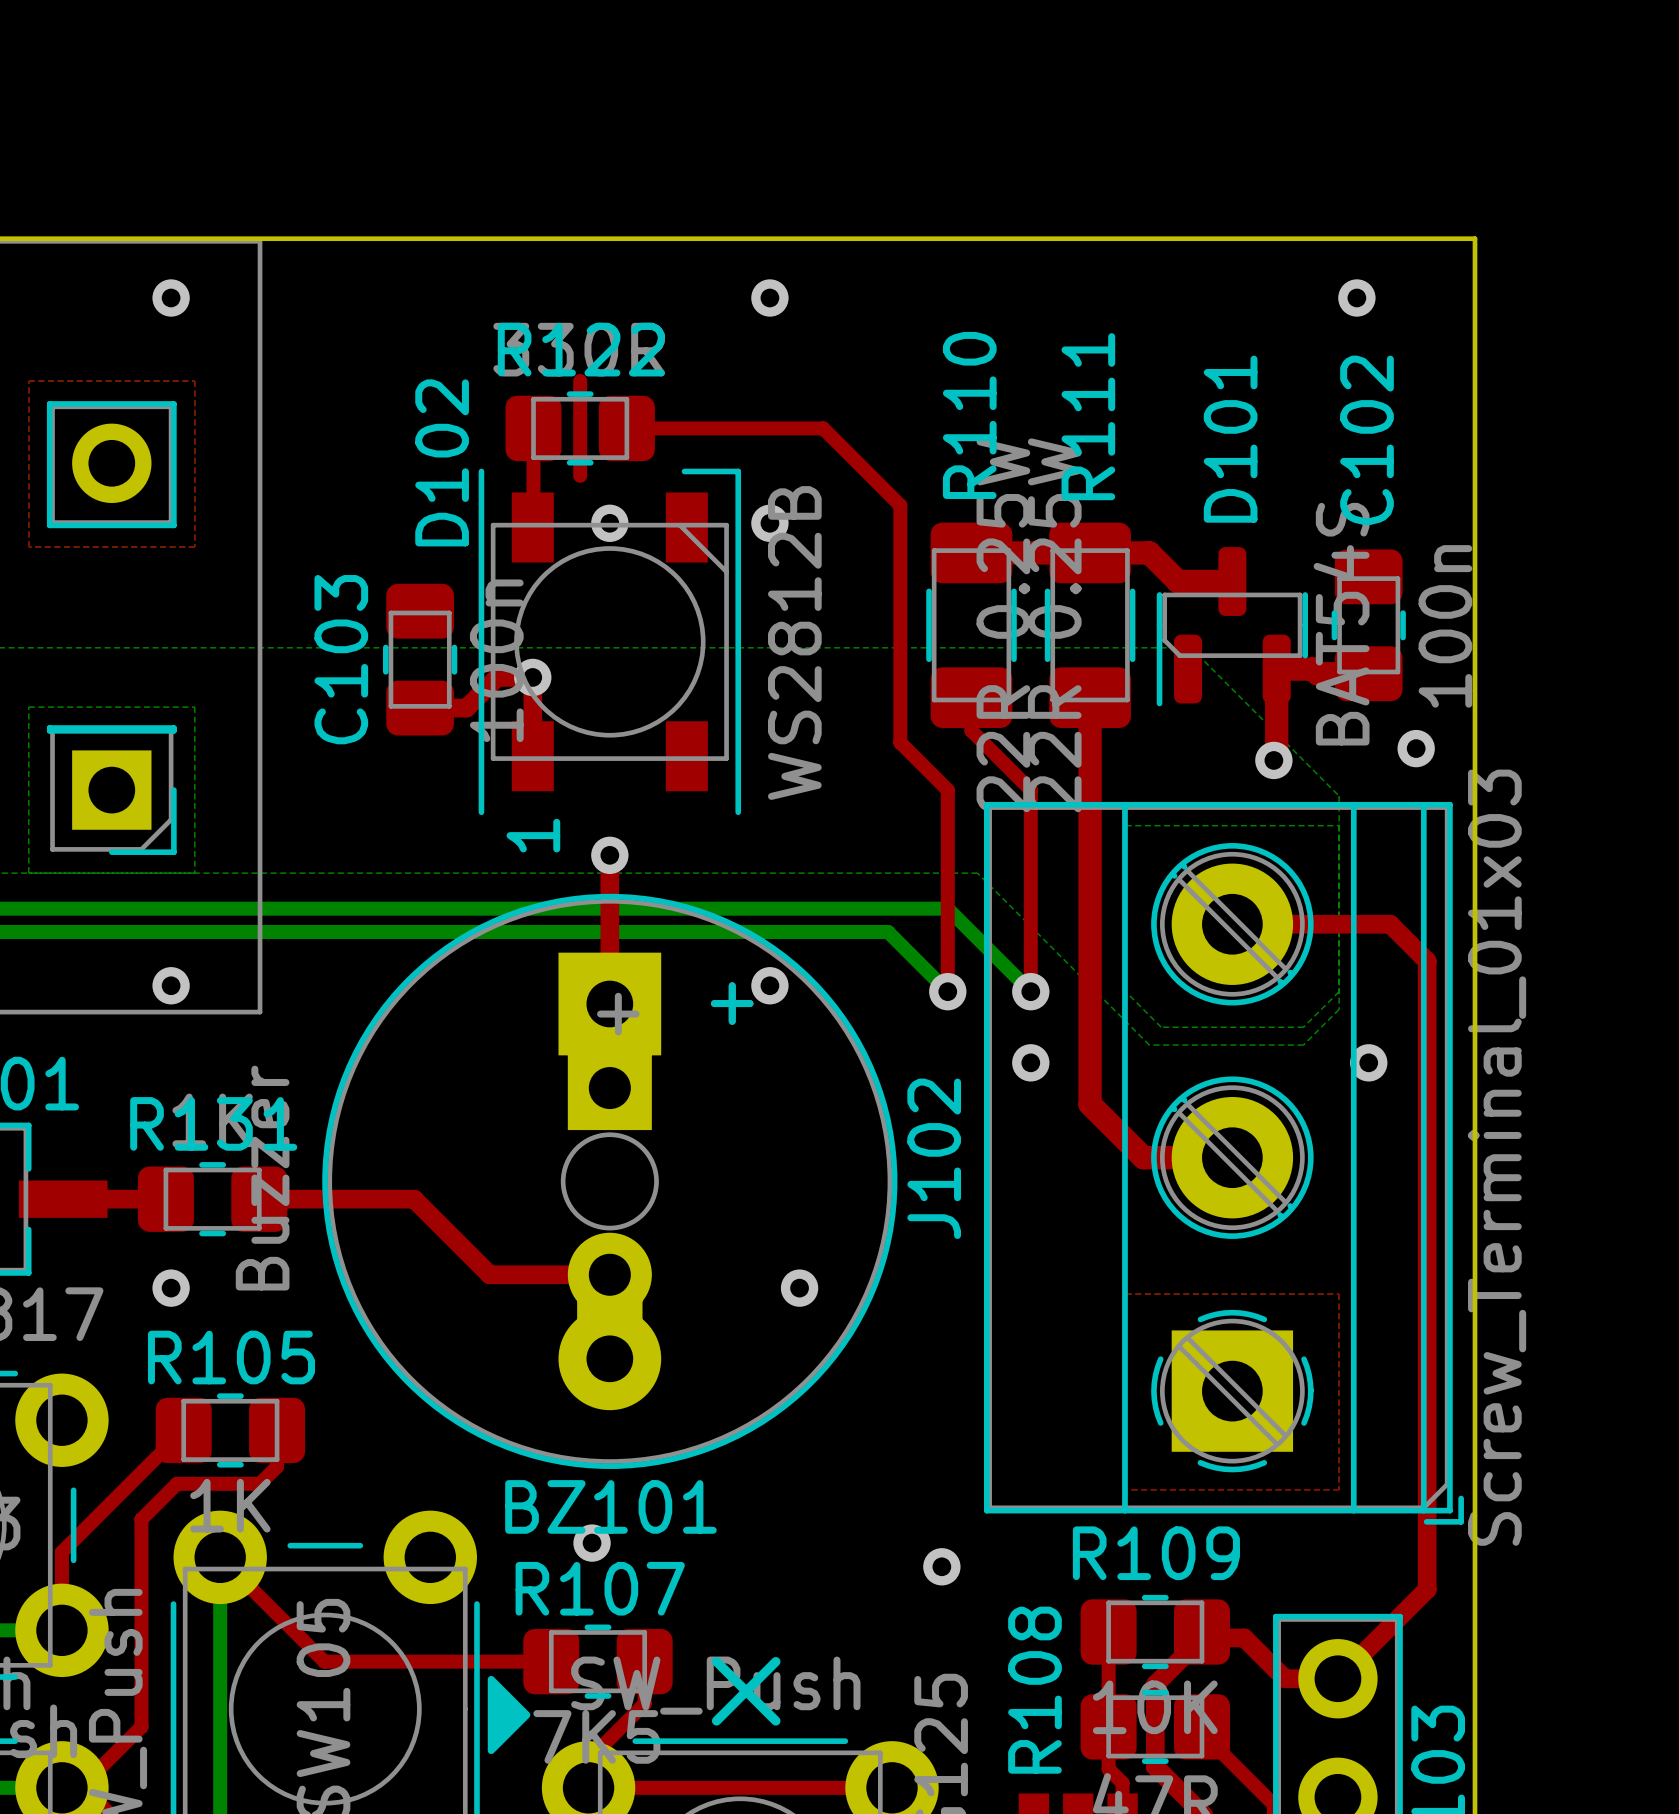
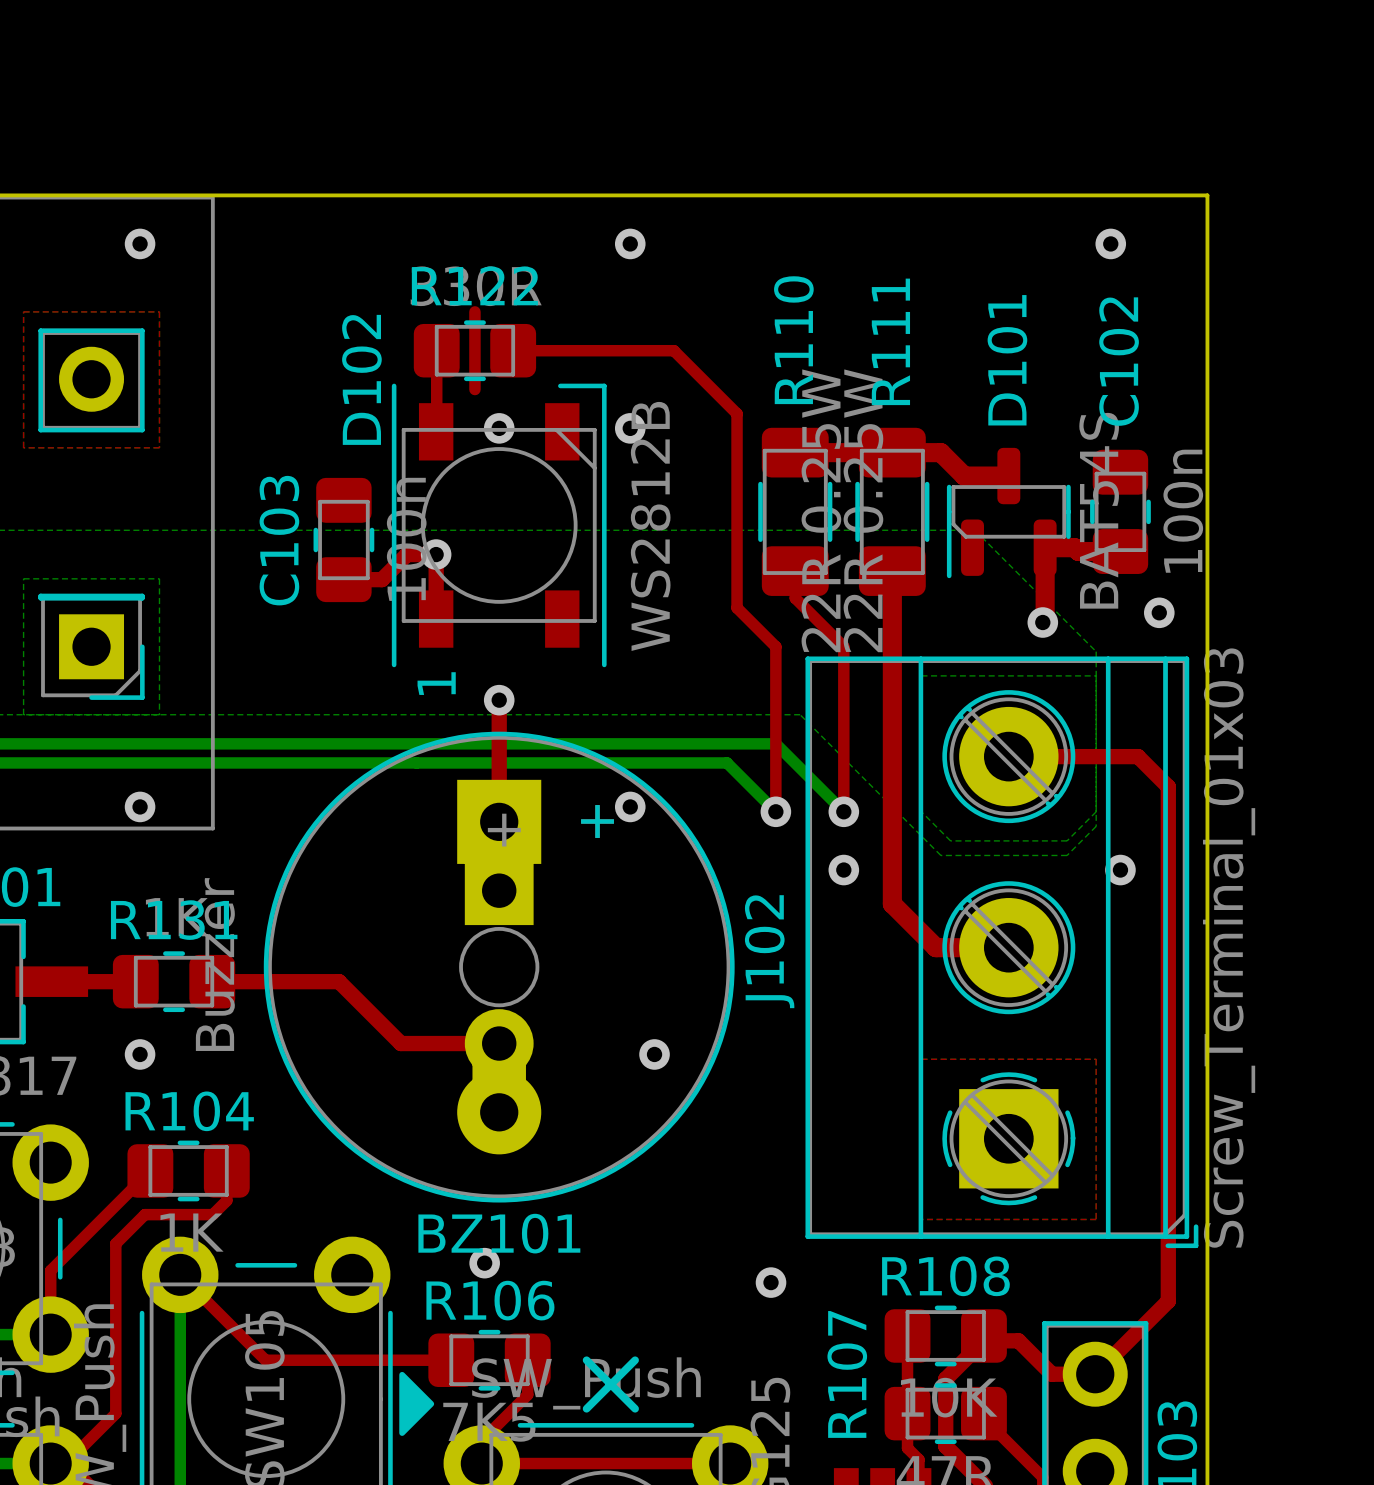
R105 name: R105 (231, 1357) -> R104 (189, 1111)
R109 name: R109 (1156, 1553) -> R108 (945, 1276)
R107 name: R107 (600, 1588) -> R106 (490, 1300)
R108 name: R108 (1034, 1690) -> R107 (847, 1374)

